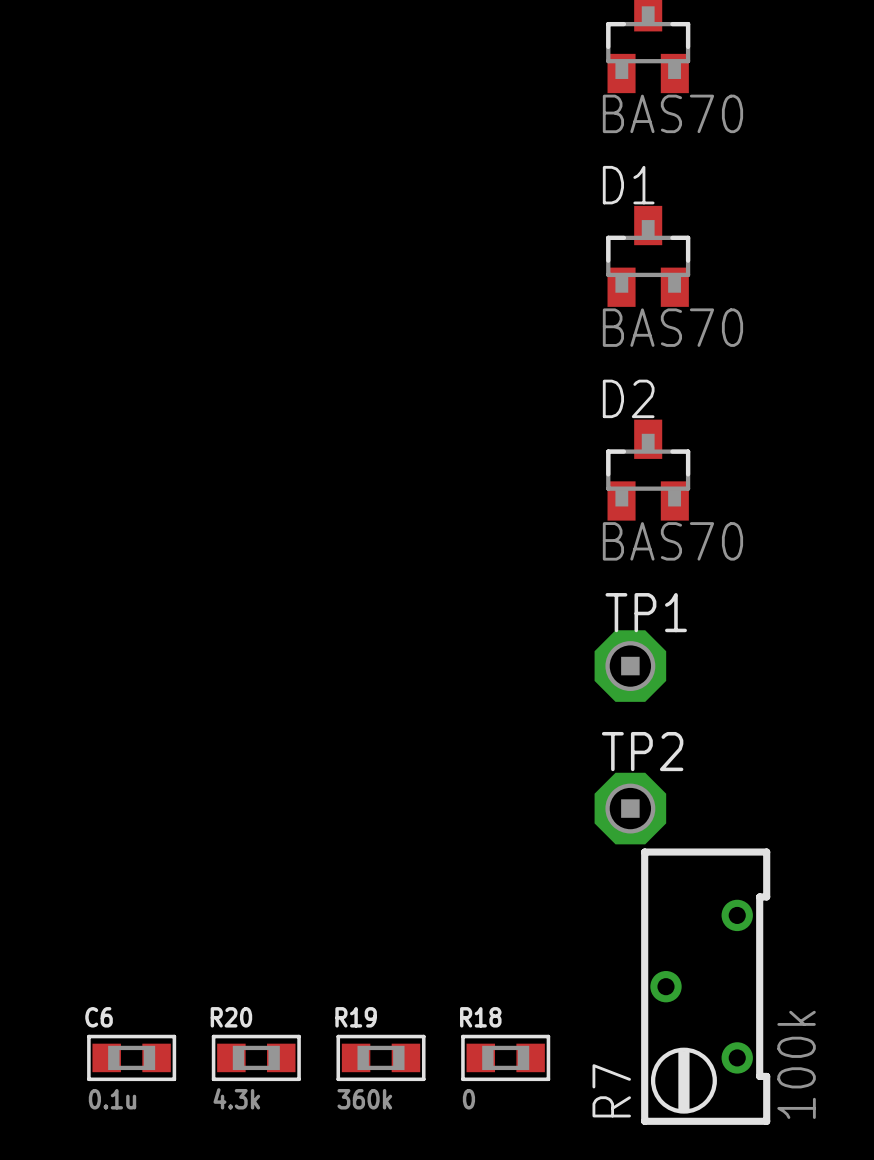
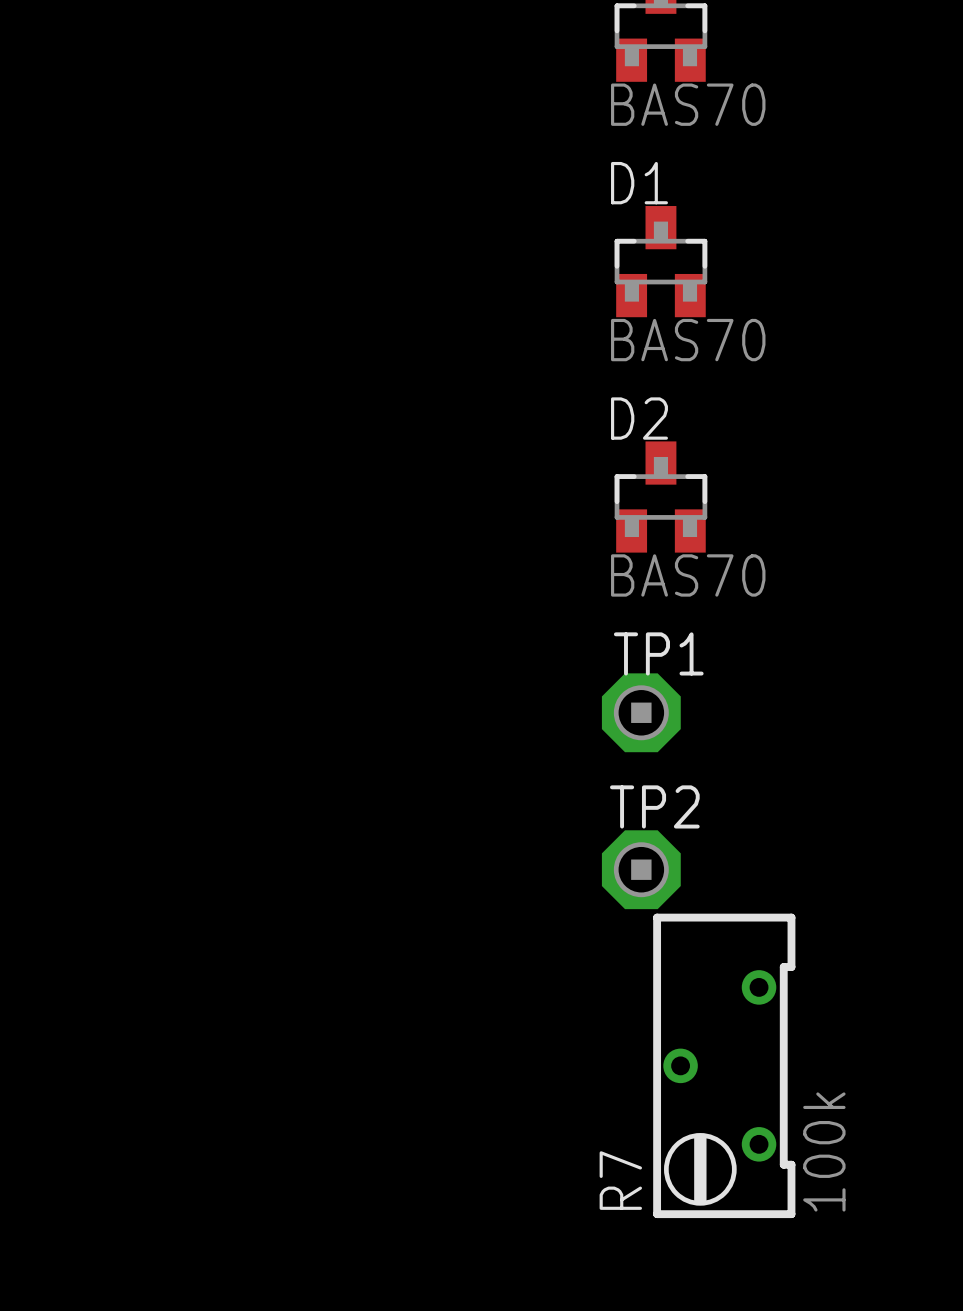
C6: 0.1u (131, 1057) -> none
R20: 4.3k (256, 1057) -> none
R19: 360k (381, 1057) -> none
R18: 0 (505, 1057) -> none

